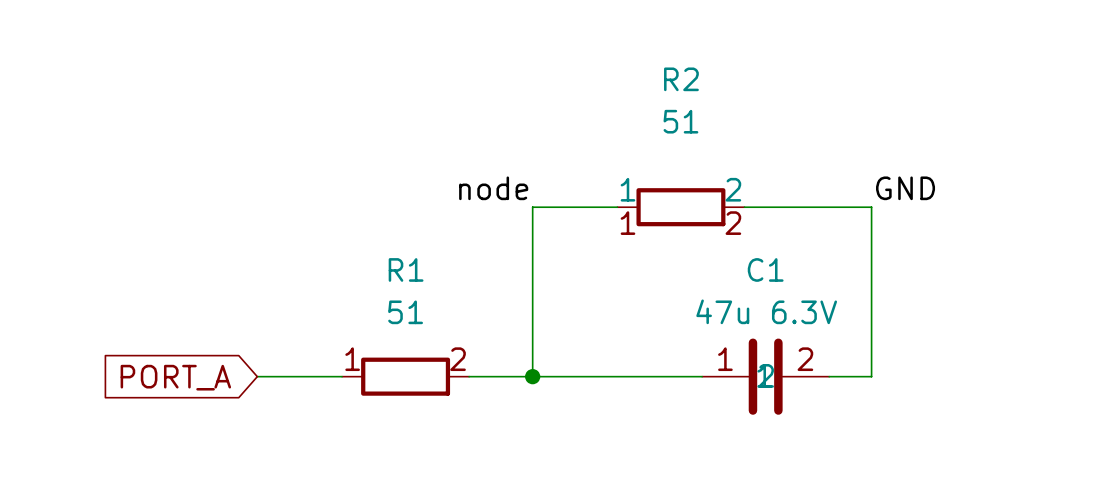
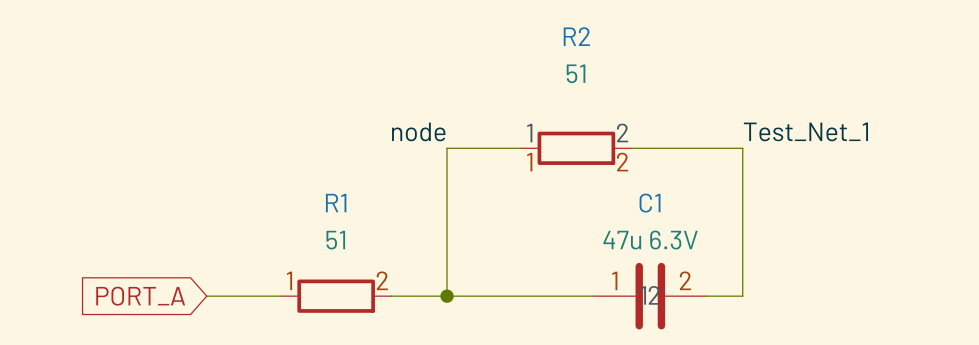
label: GND (905, 188) -> Test_Net_1 (805, 131)

